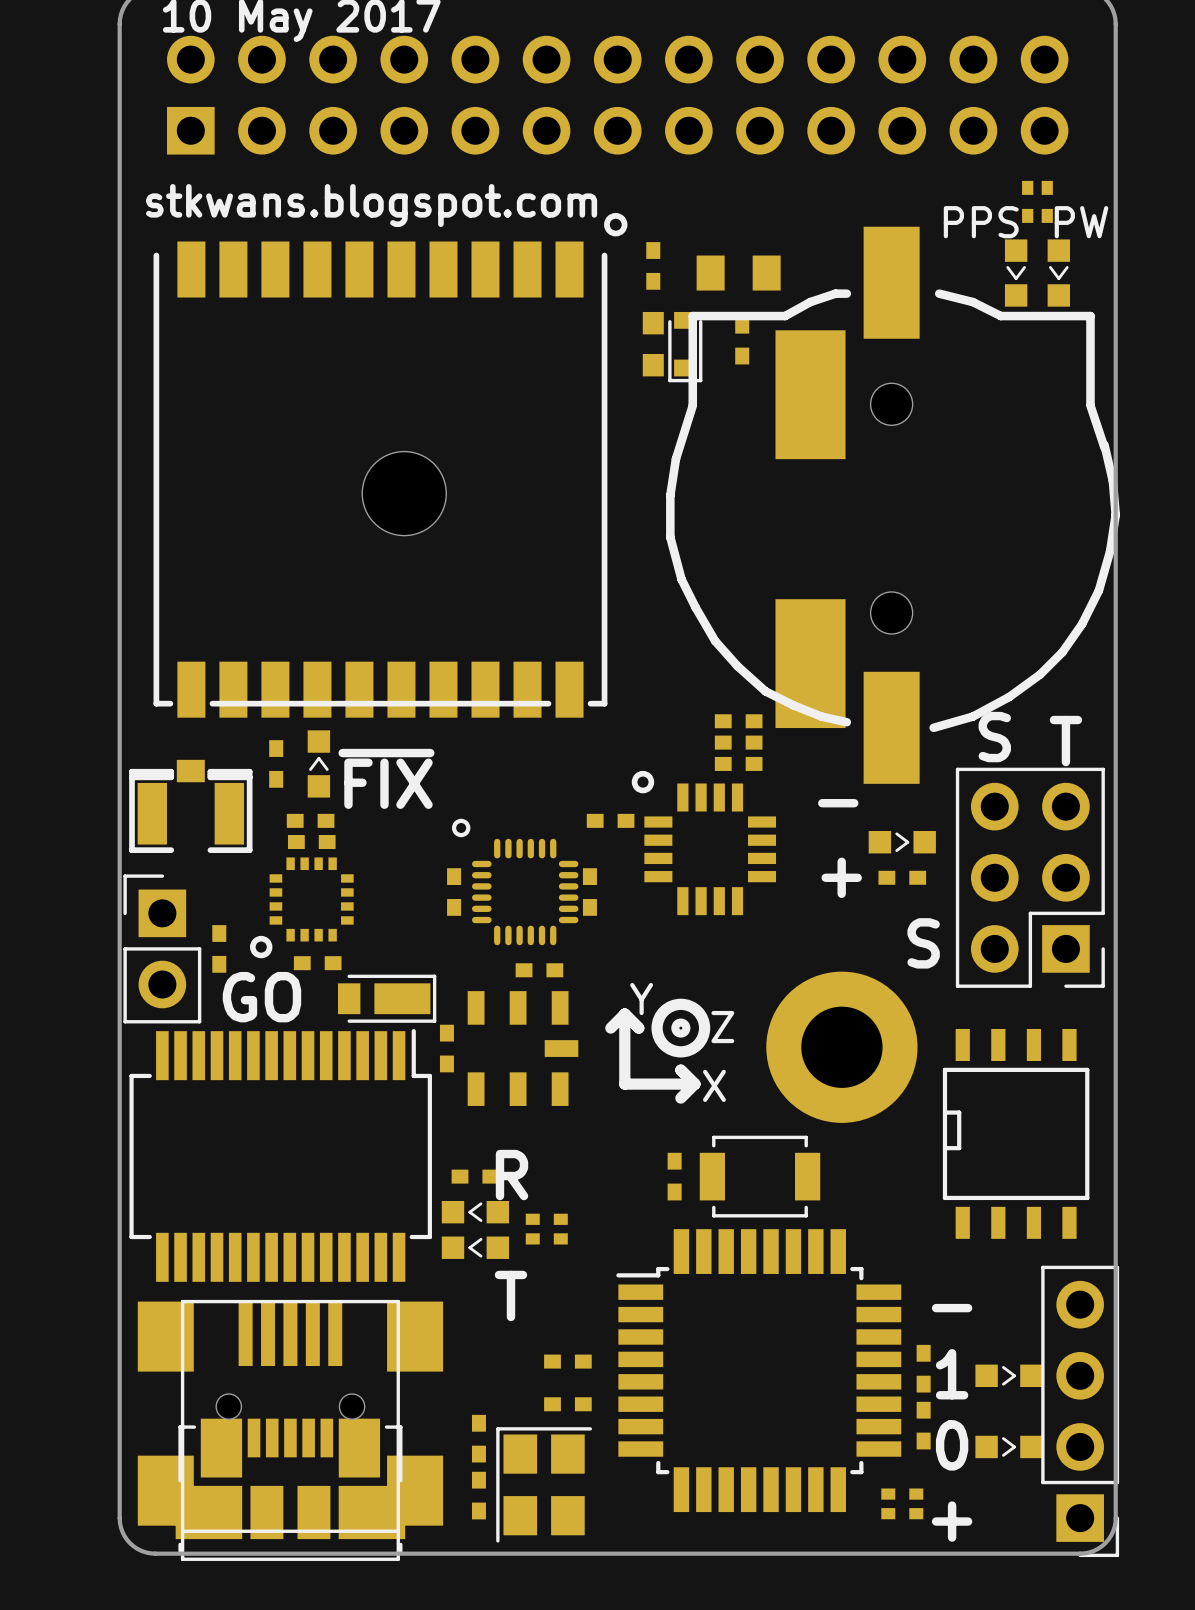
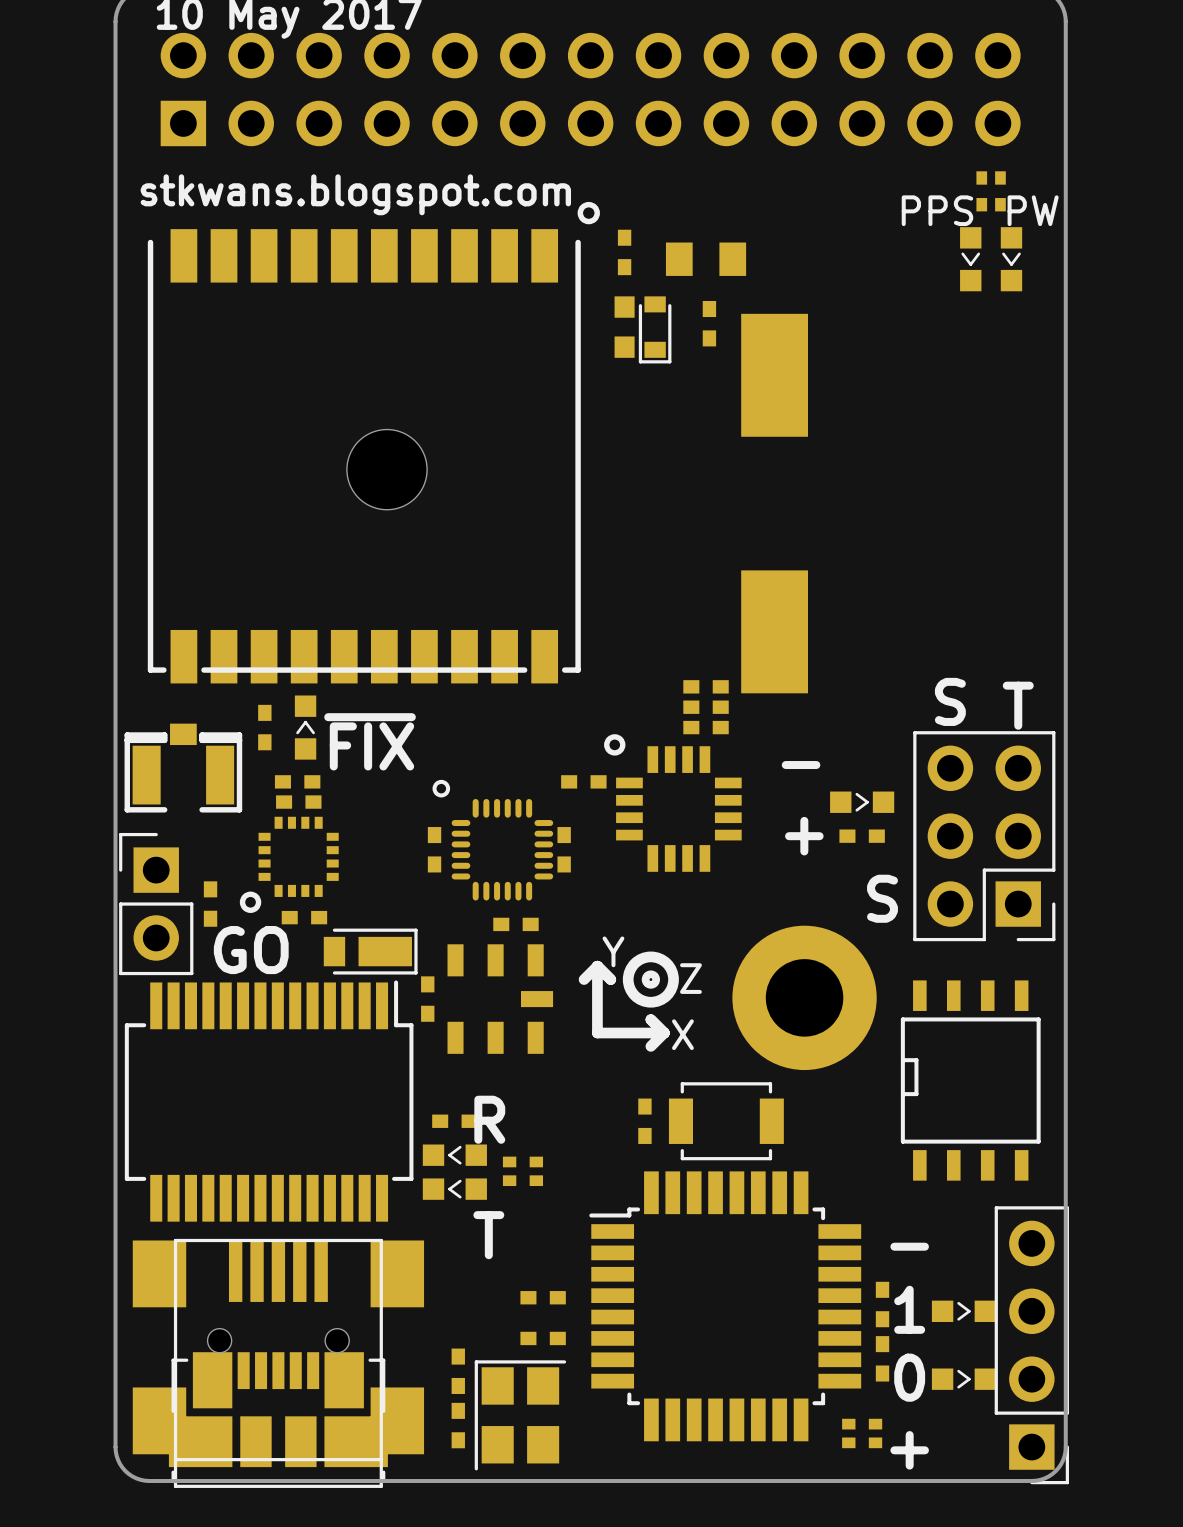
part: (893, 505) -> none

